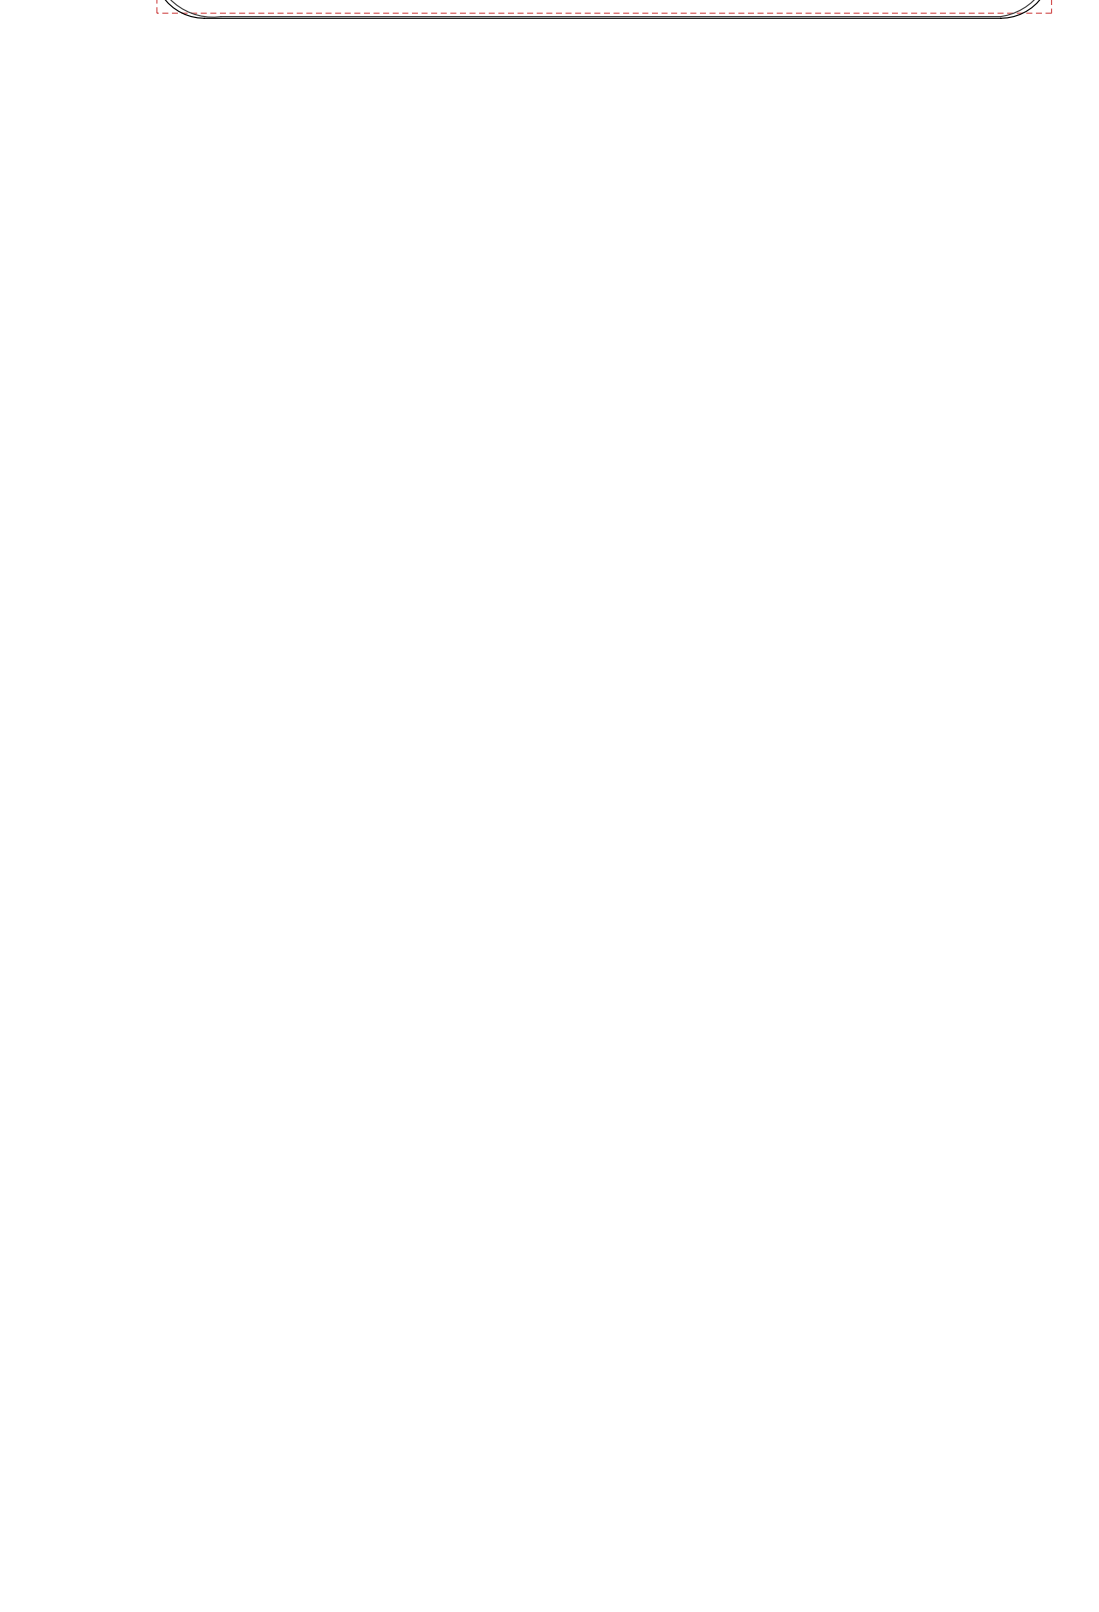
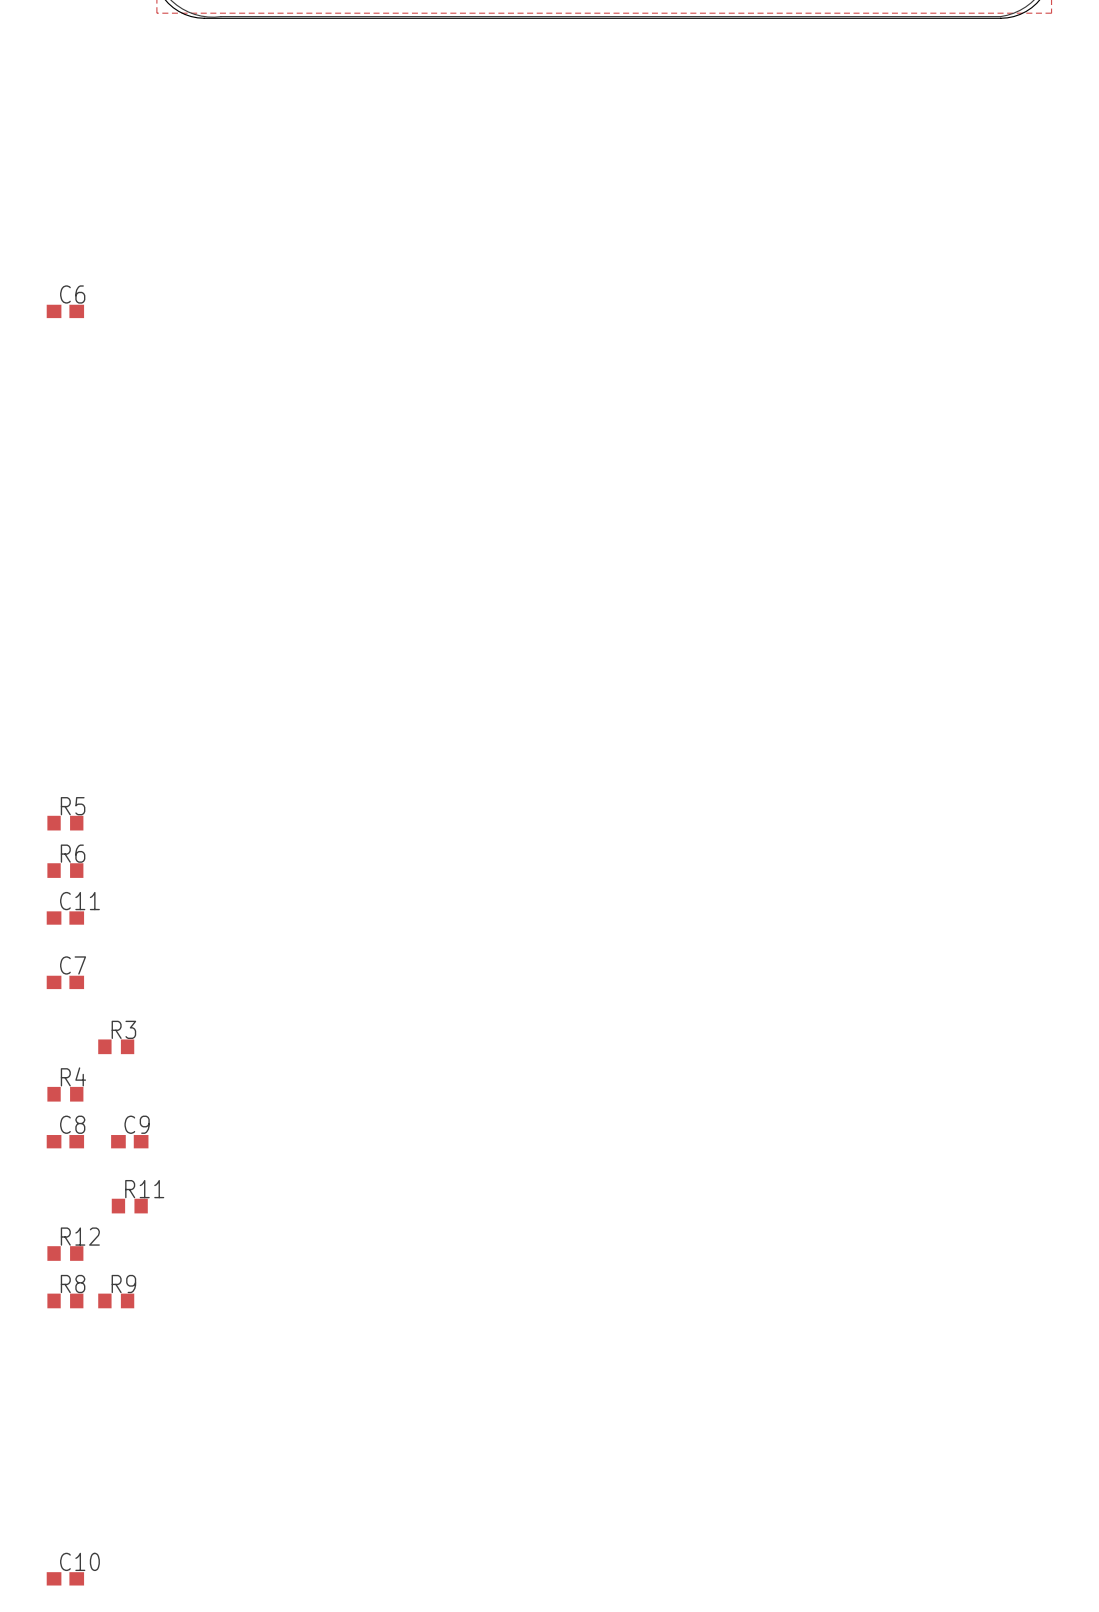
C6: none -> (65, 311)
R5: none -> (65, 823)
R6: none -> (65, 870)
C11: none -> (65, 918)
C7: none -> (65, 982)
R3: none -> (116, 1046)
R4: none -> (65, 1094)
C8: none -> (65, 1141)
C9: none -> (129, 1141)
R11: none -> (129, 1206)
R12: none -> (65, 1253)
R8: none -> (65, 1300)
R9: none -> (116, 1300)
C10: none -> (65, 1578)

